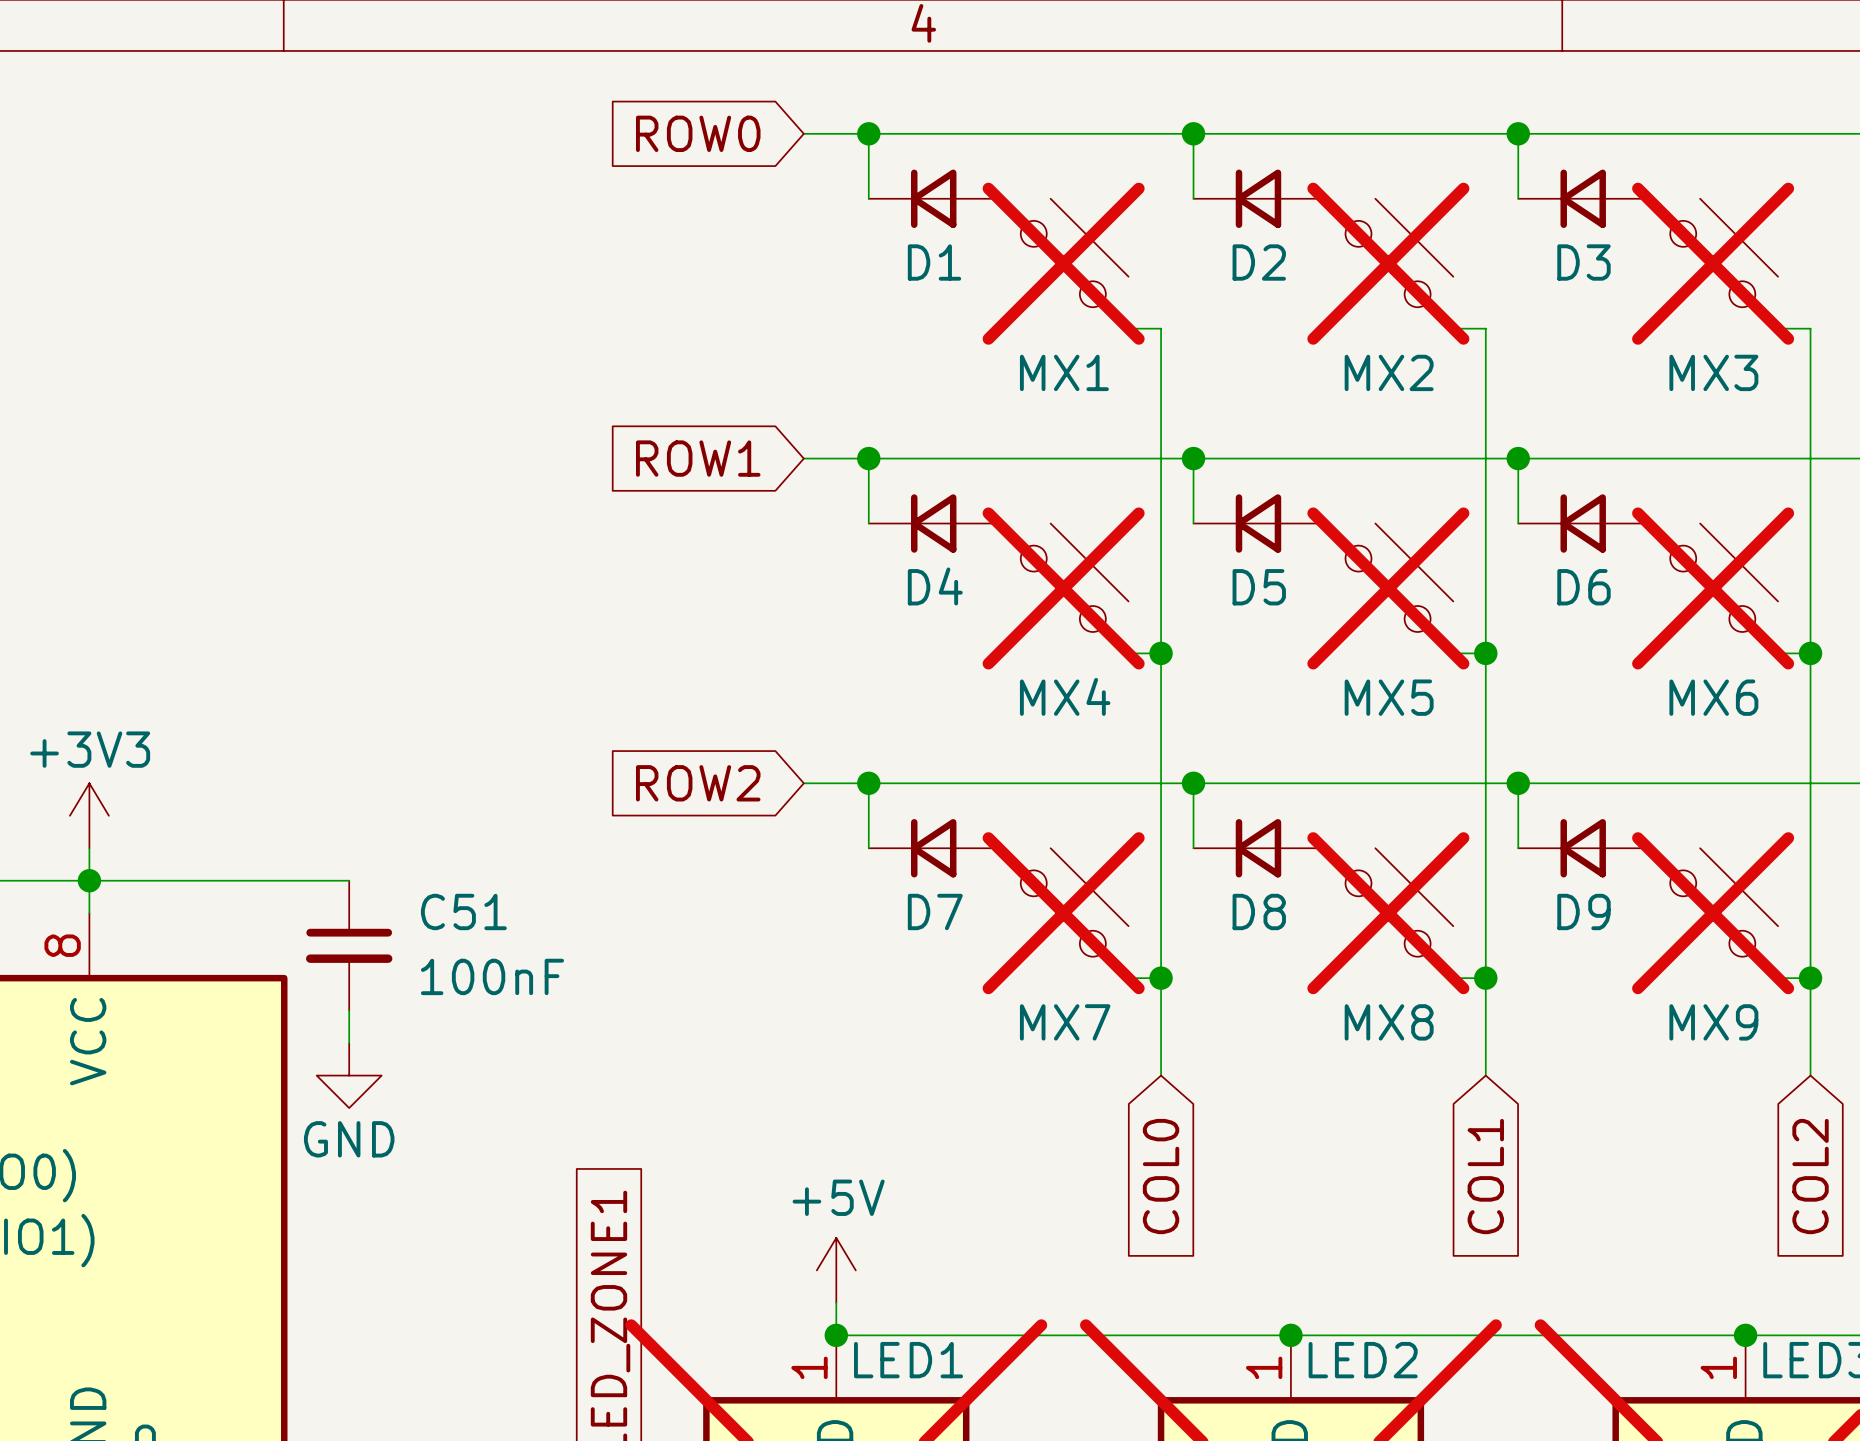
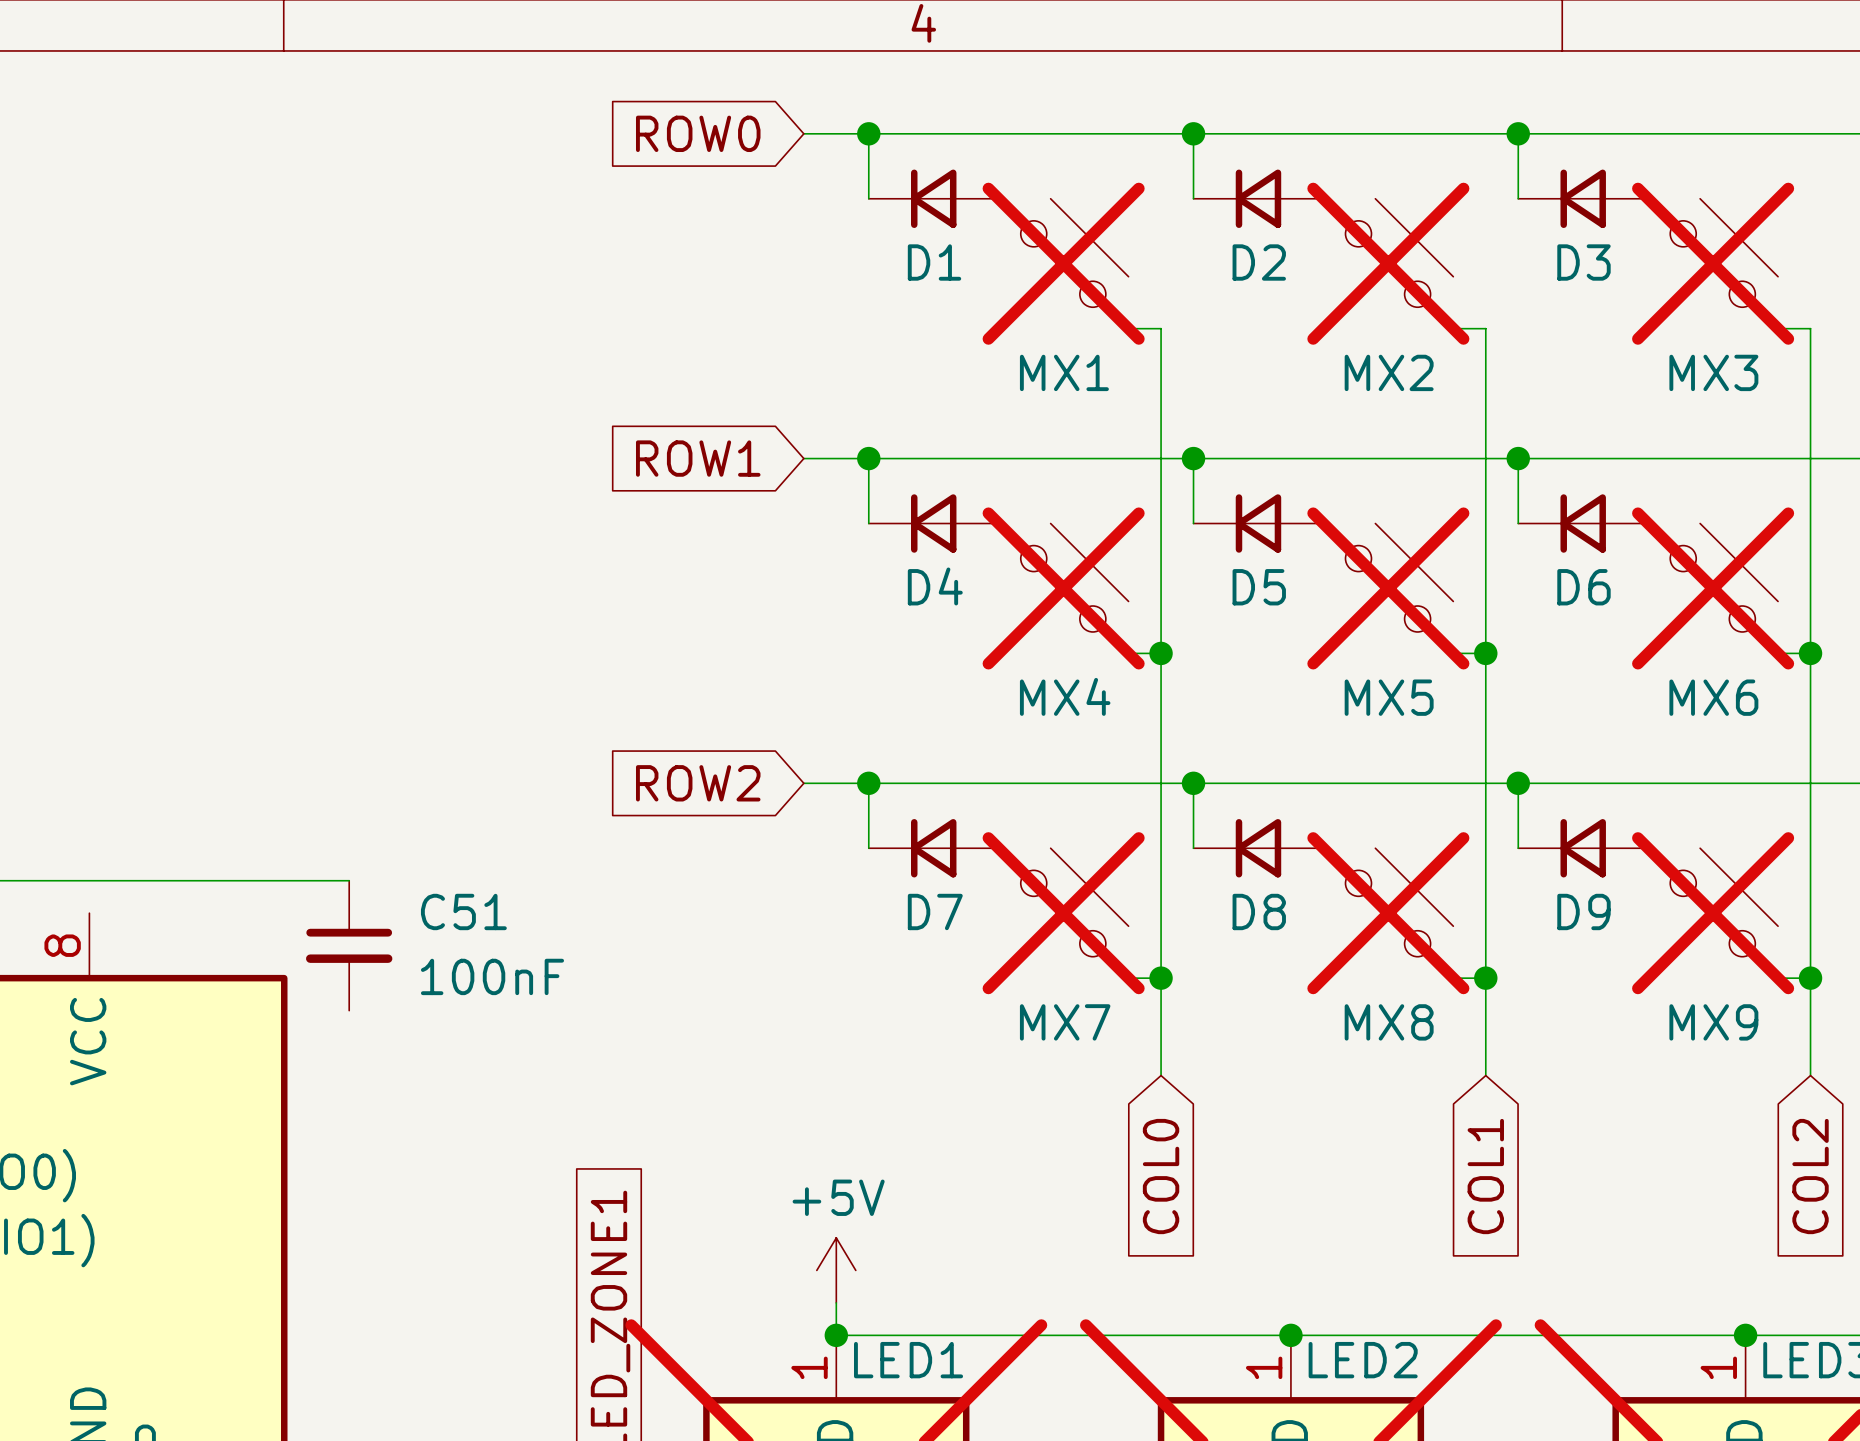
power symbol: +3V3 (89, 815) -> none
wire: (89, 848) (89, 913) -> none
junction: (89, 880) -> none
wire: (349, 1010) (349, 1043) -> none
power symbol: GND (349, 1075) -> none

